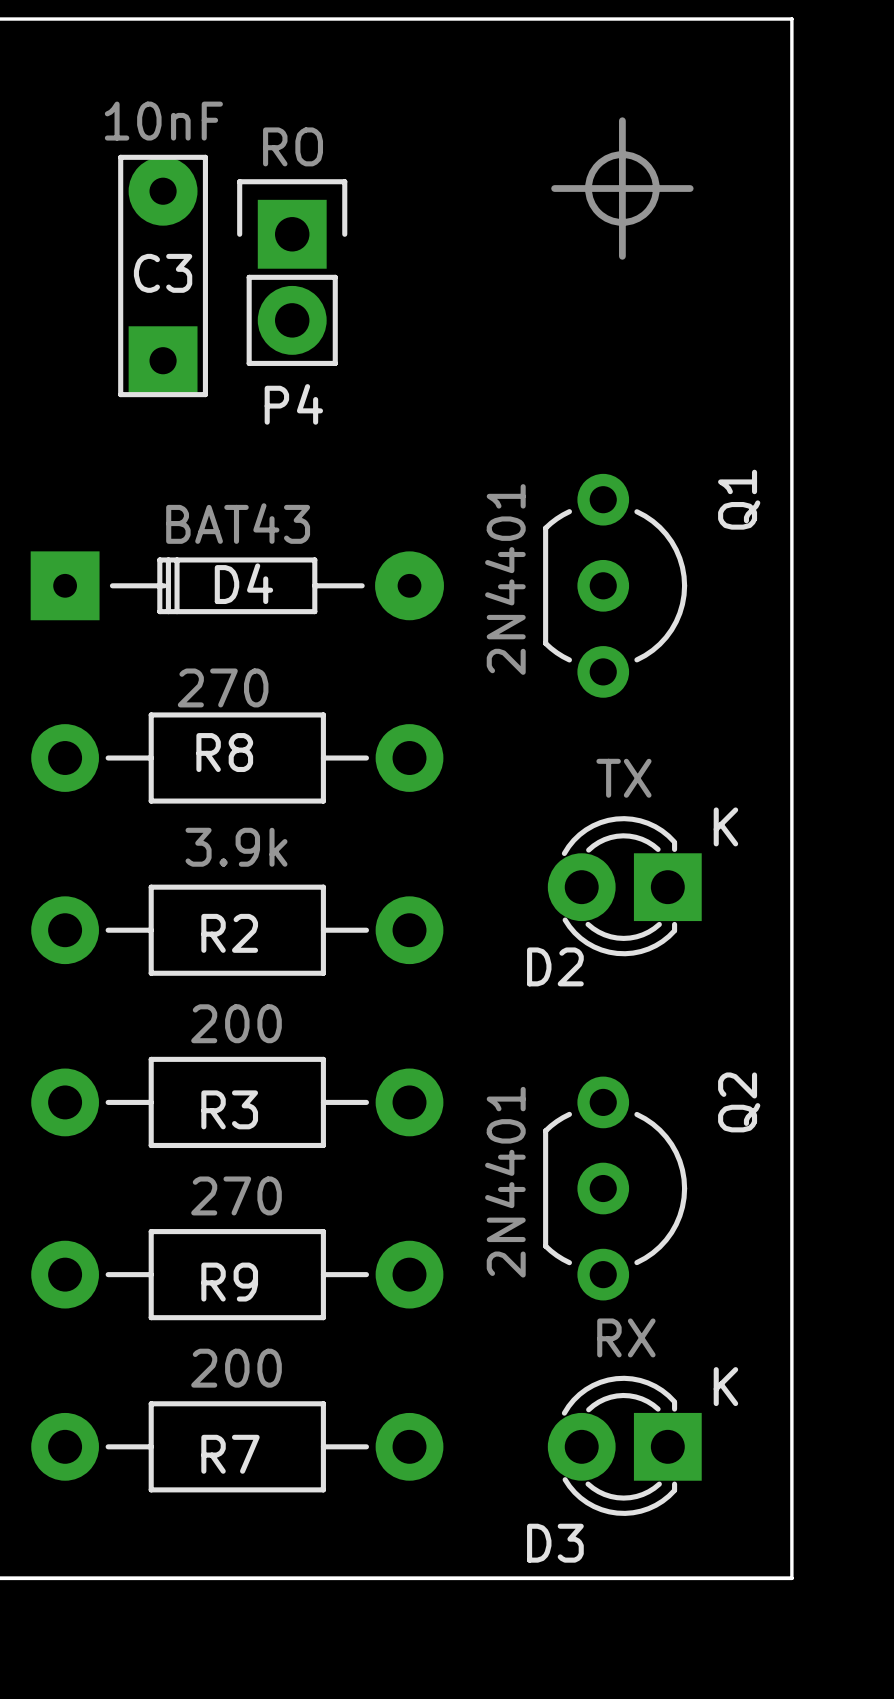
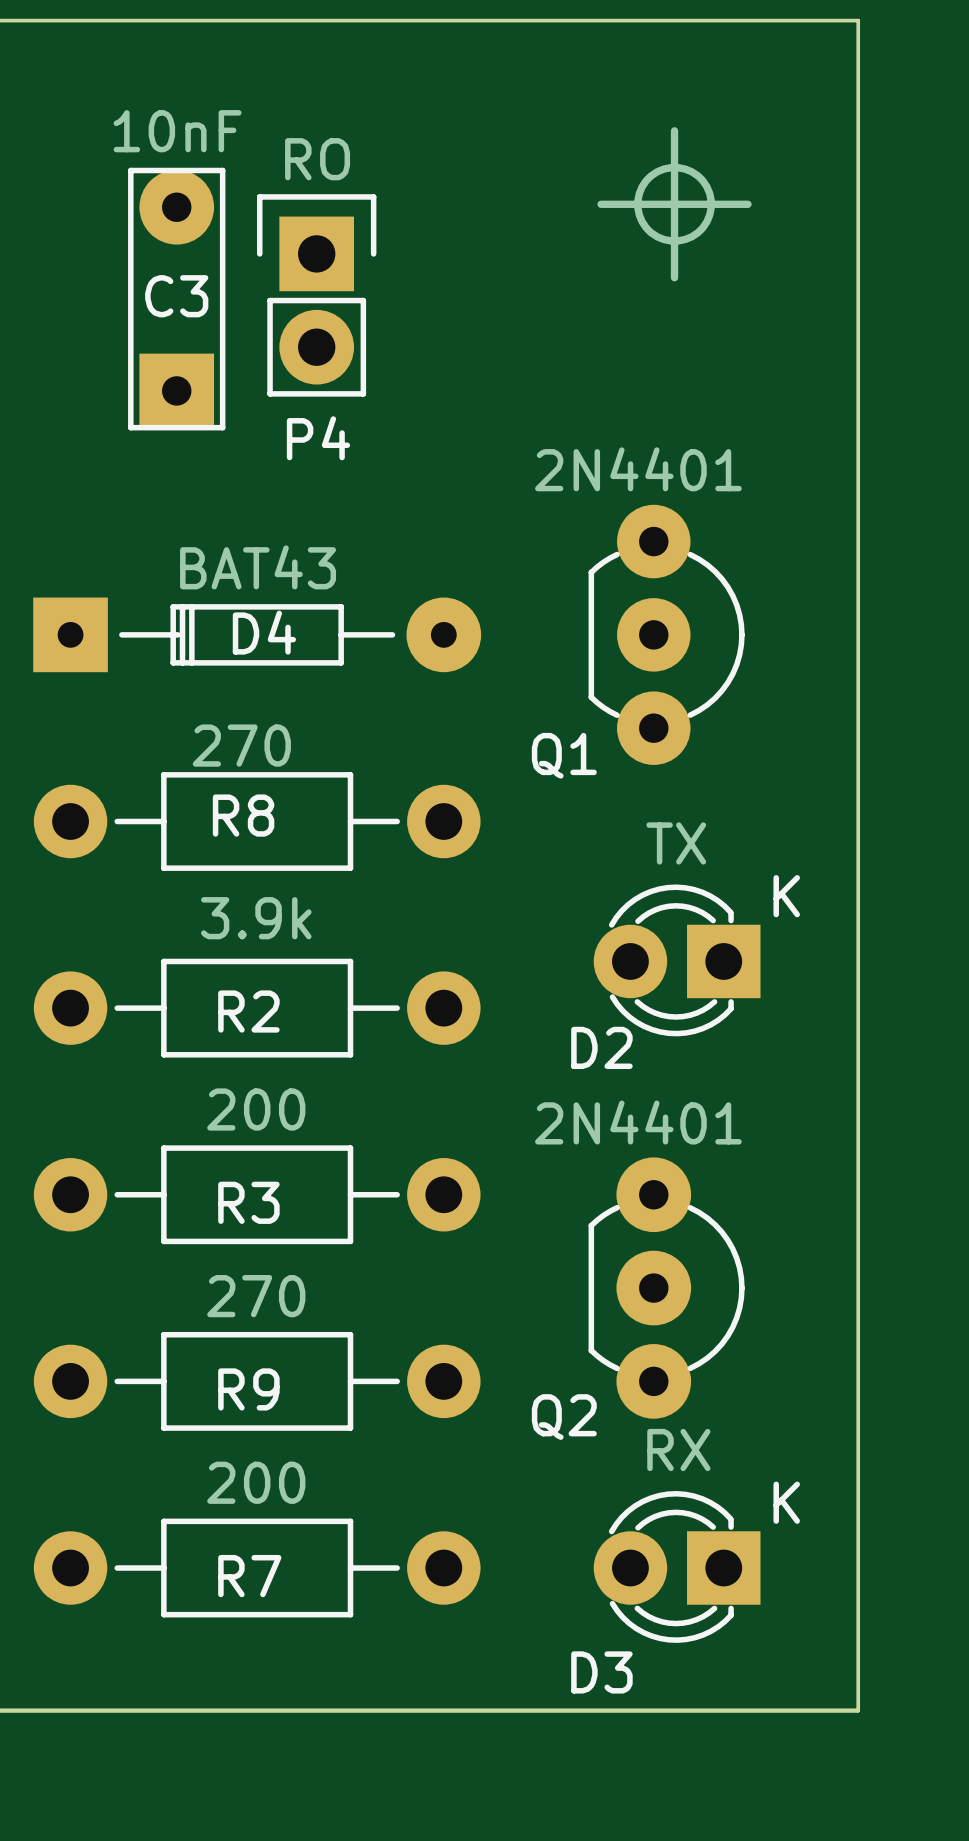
Q1 footprint: [543, 473, 688, 698] -> [588, 504, 745, 765]
Q1 name rotation: 0° (739, 499) -> 90° clockwise (564, 755)
Q1 name position: Q1 (739, 499) -> Q1 (564, 755)
Q1 value rotation: 0° (505, 579) -> 90° clockwise (638, 469)
Q2 footprint: [543, 1076, 688, 1301] -> [588, 1157, 745, 1419]
Q2 name rotation: 0° (739, 1102) -> 90° clockwise (564, 1417)
Q2 name position: Q2 (739, 1102) -> Q2 (564, 1417)
Q2 value rotation: 0° (505, 1182) -> 90° clockwise (638, 1122)

